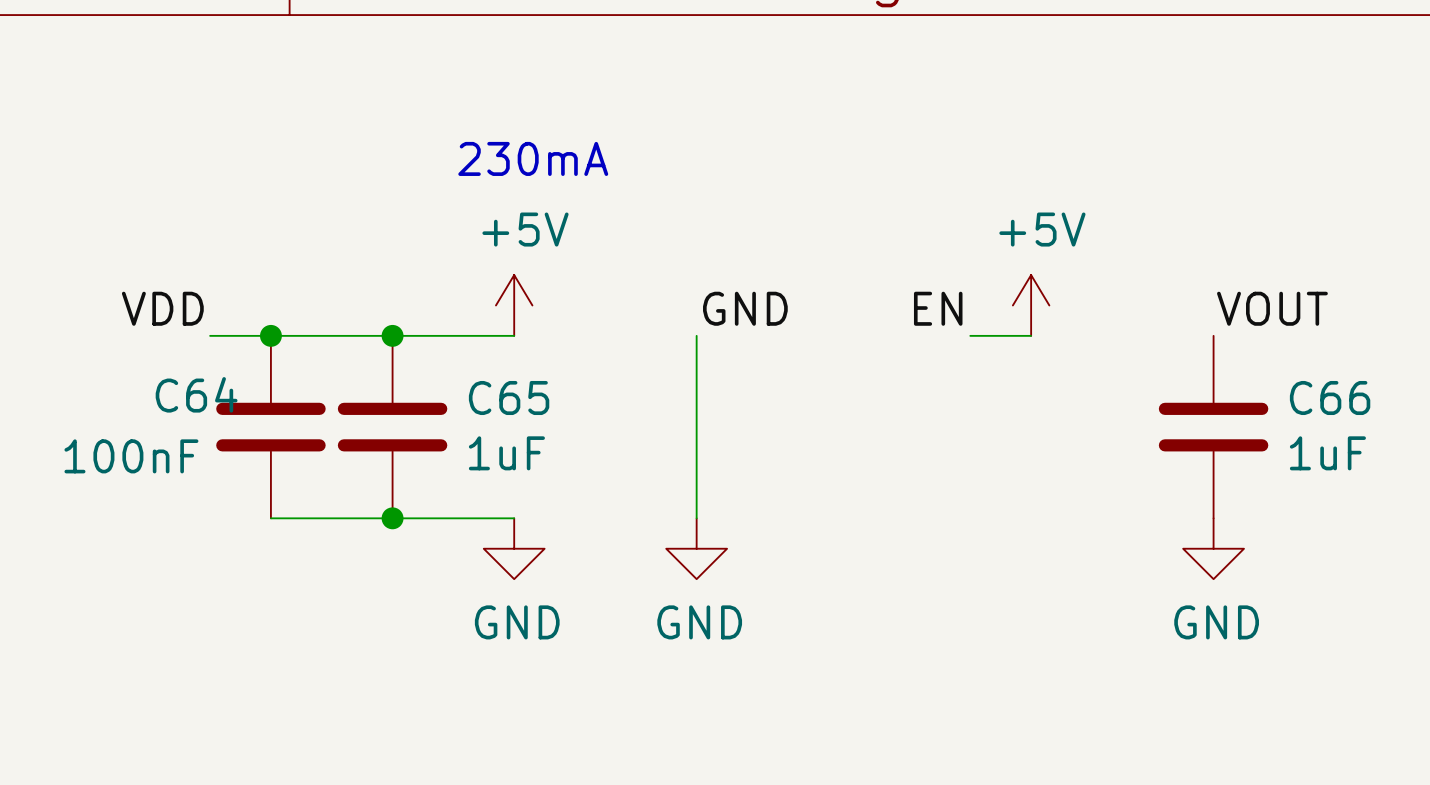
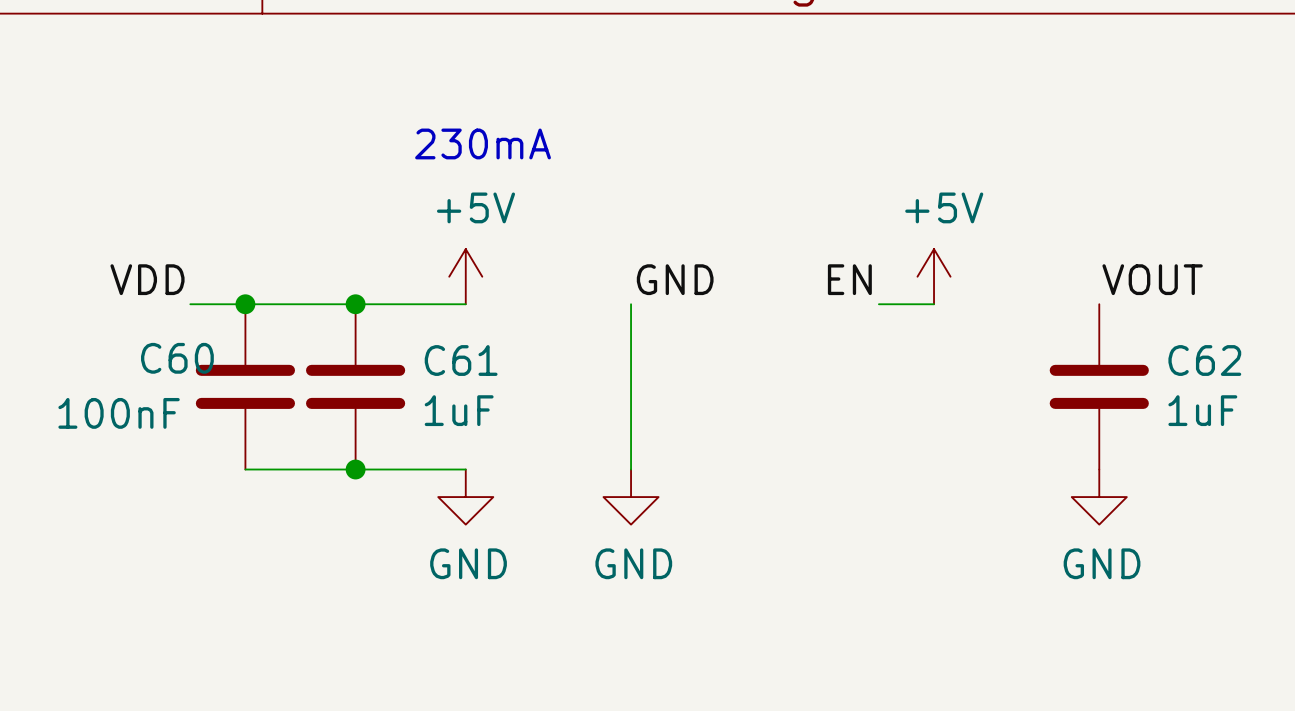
C64 name: C64 (196, 394) -> C60 (177, 358)
C65 name: C65 (509, 397) -> C61 (461, 360)
C66 name: C66 (1330, 397) -> C62 (1204, 360)

